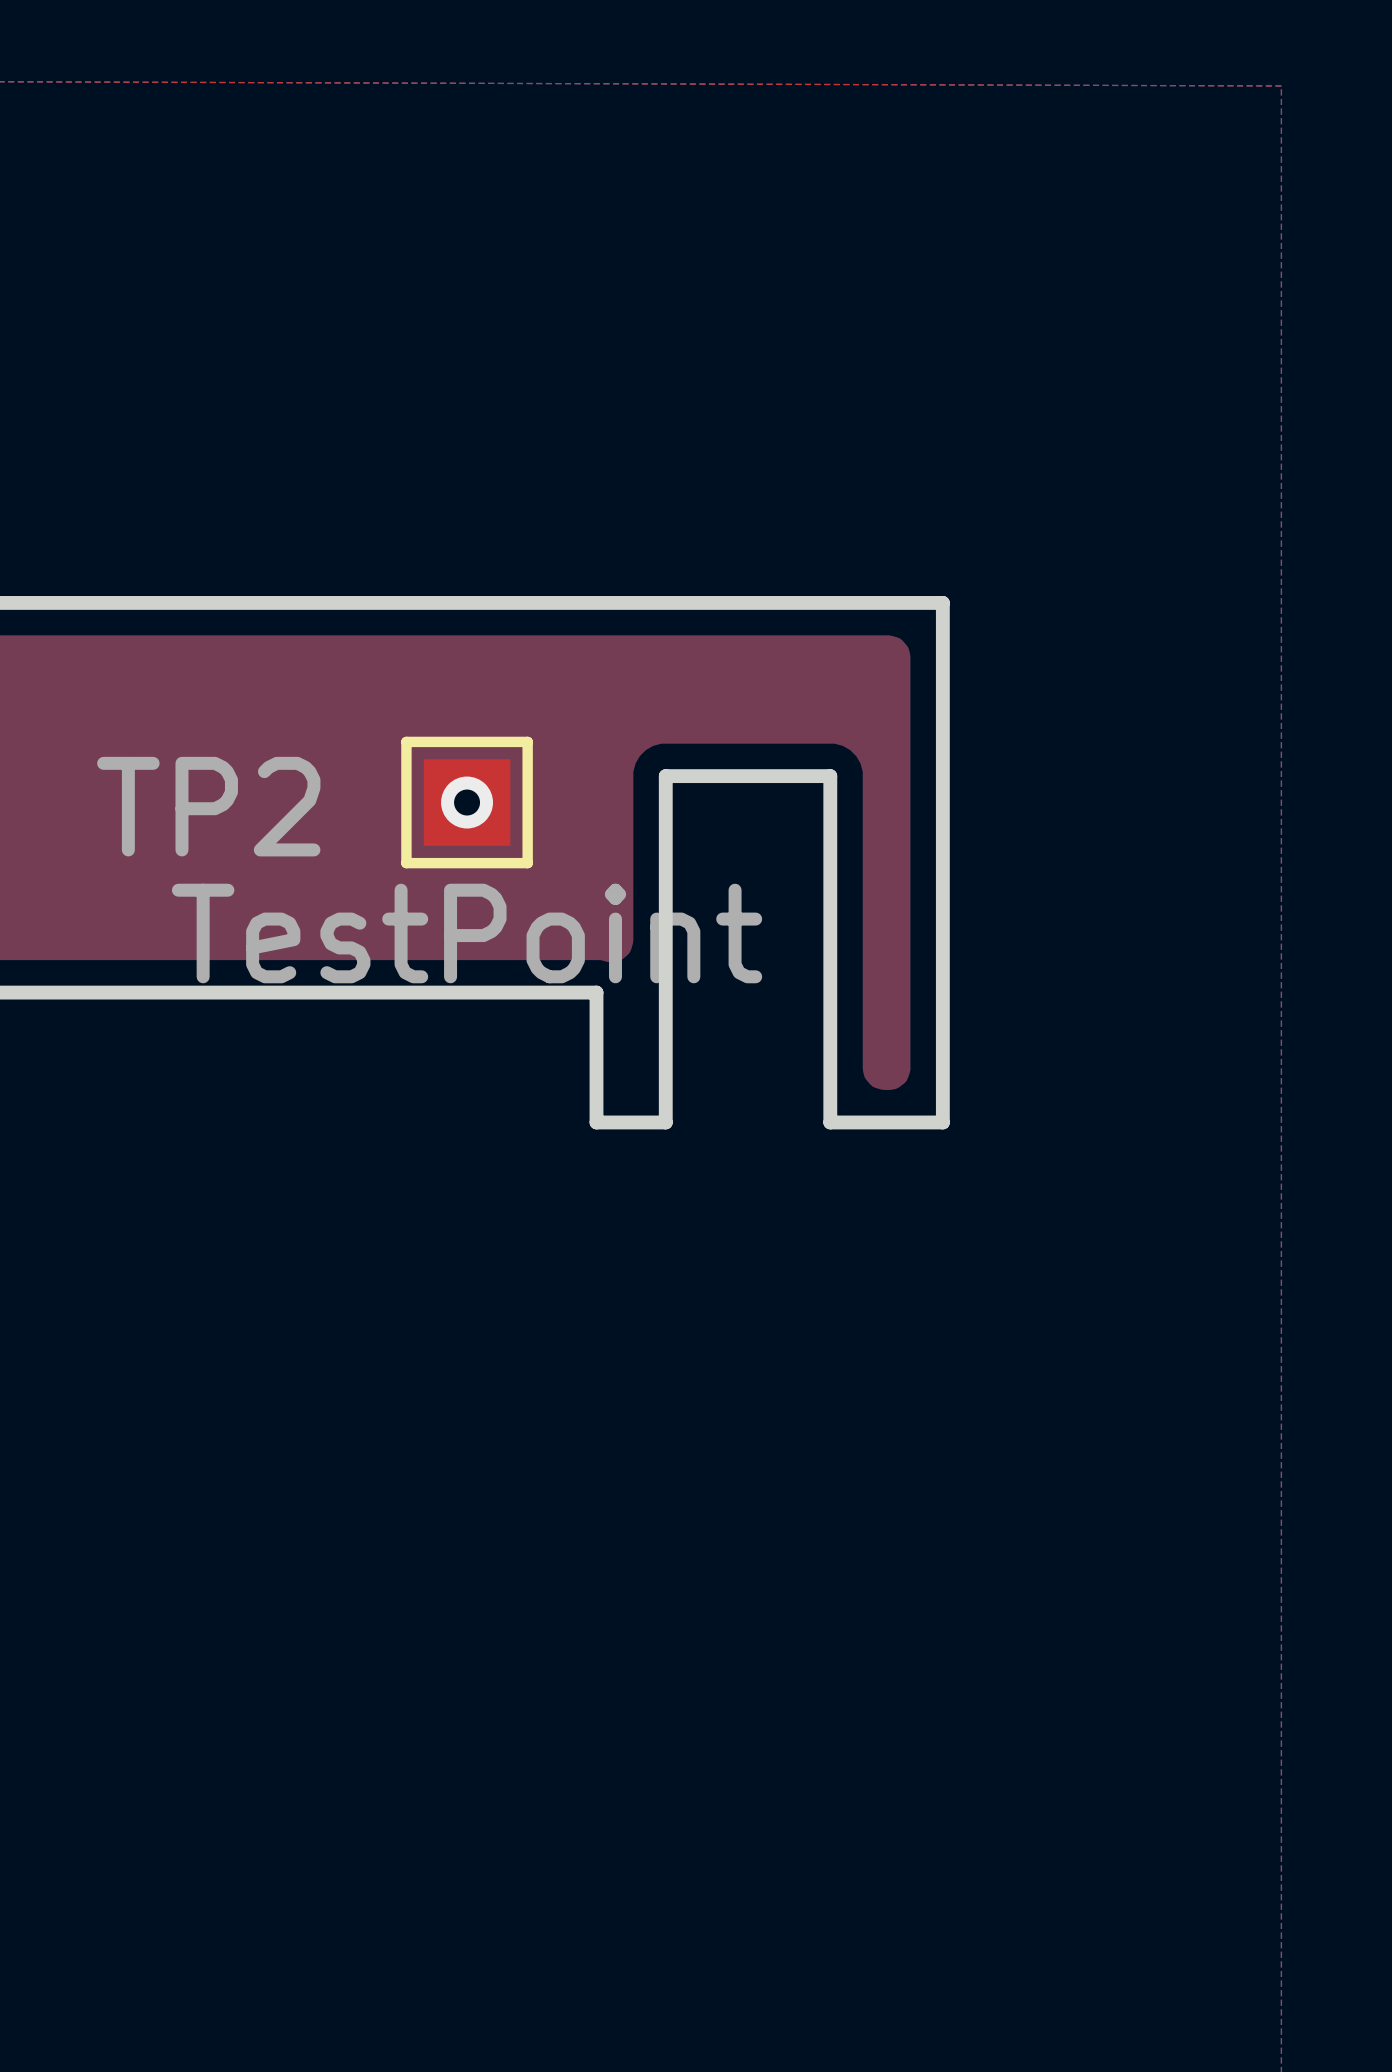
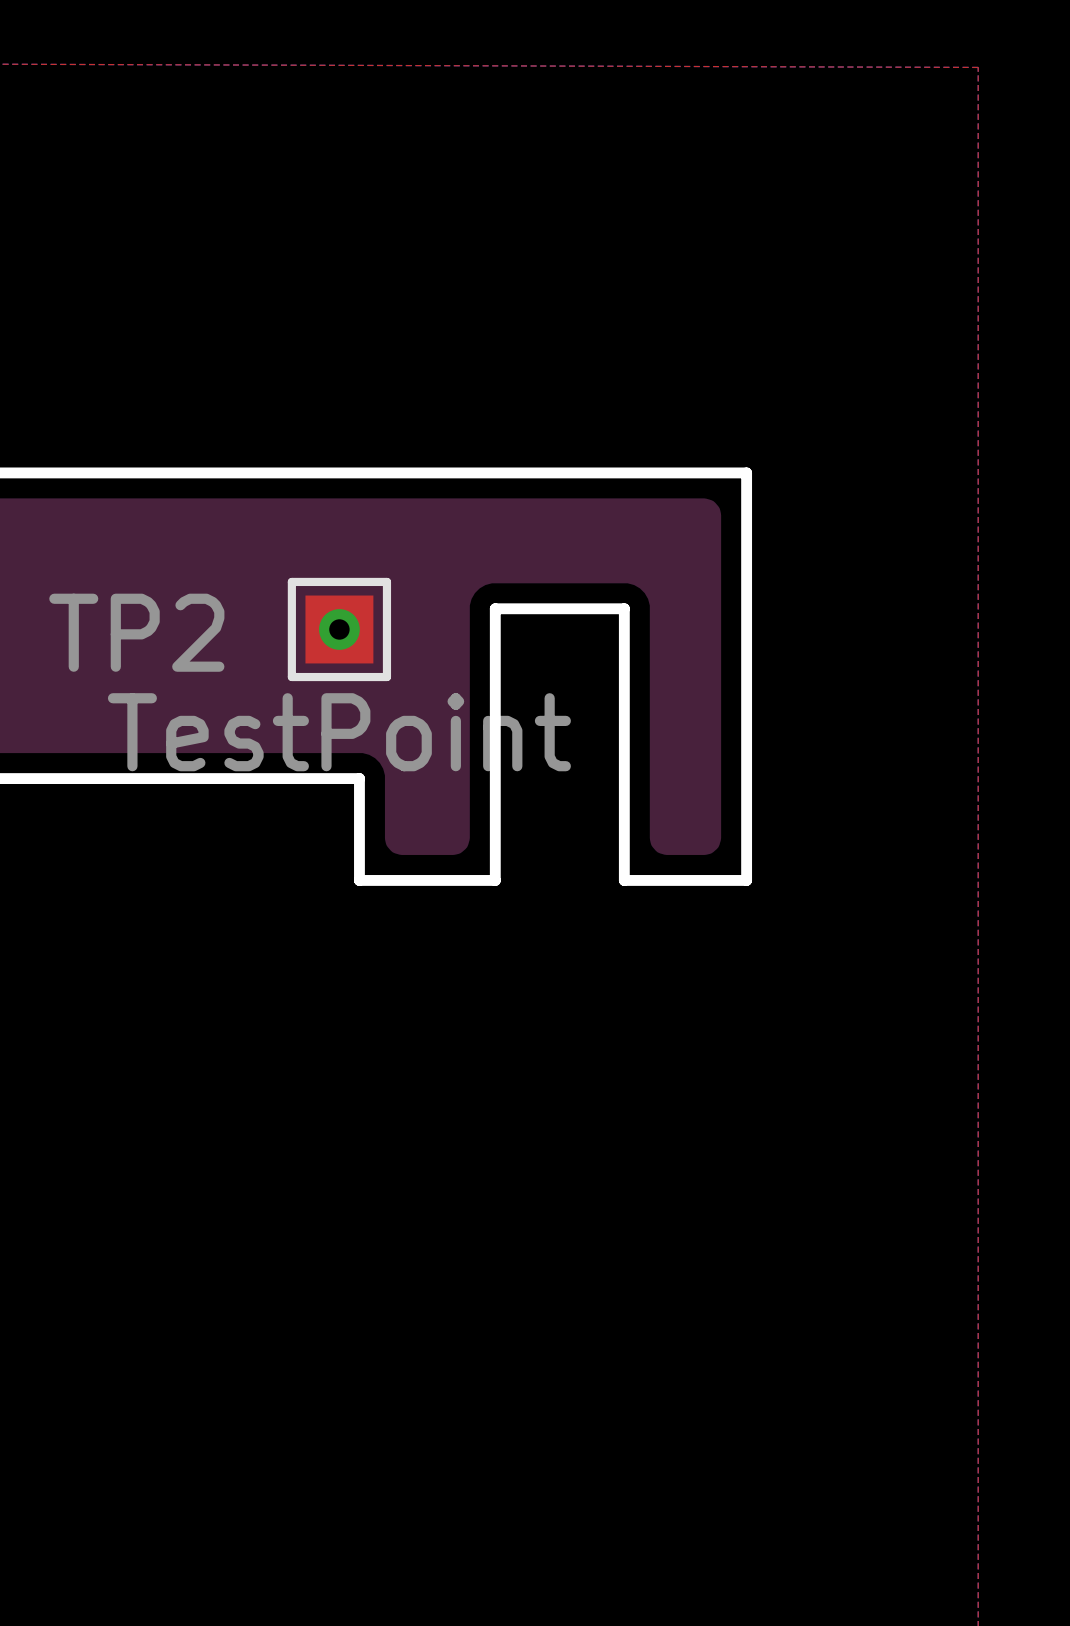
board edge: (942, 602) (942, 1122) -> (712, 472) (746, 472) (746, 880) (712, 880)
board edge: (492, 992) (596, 992) (596, 1122) -> (359, 778) (359, 880) (440, 880)

